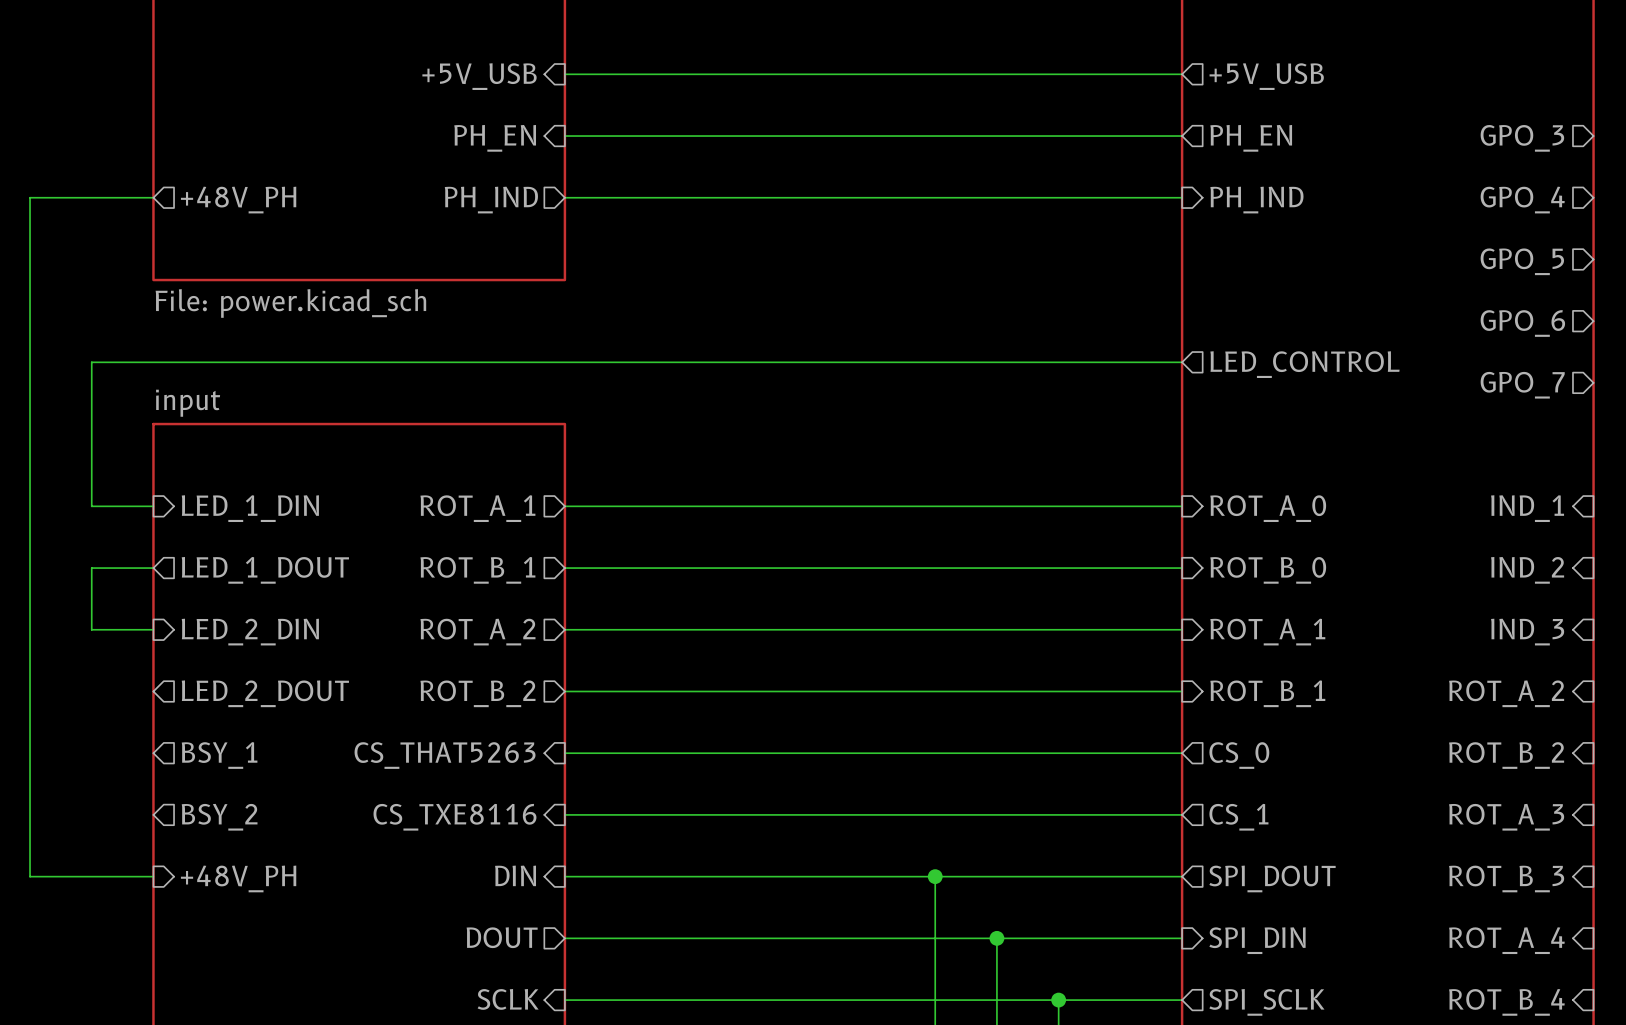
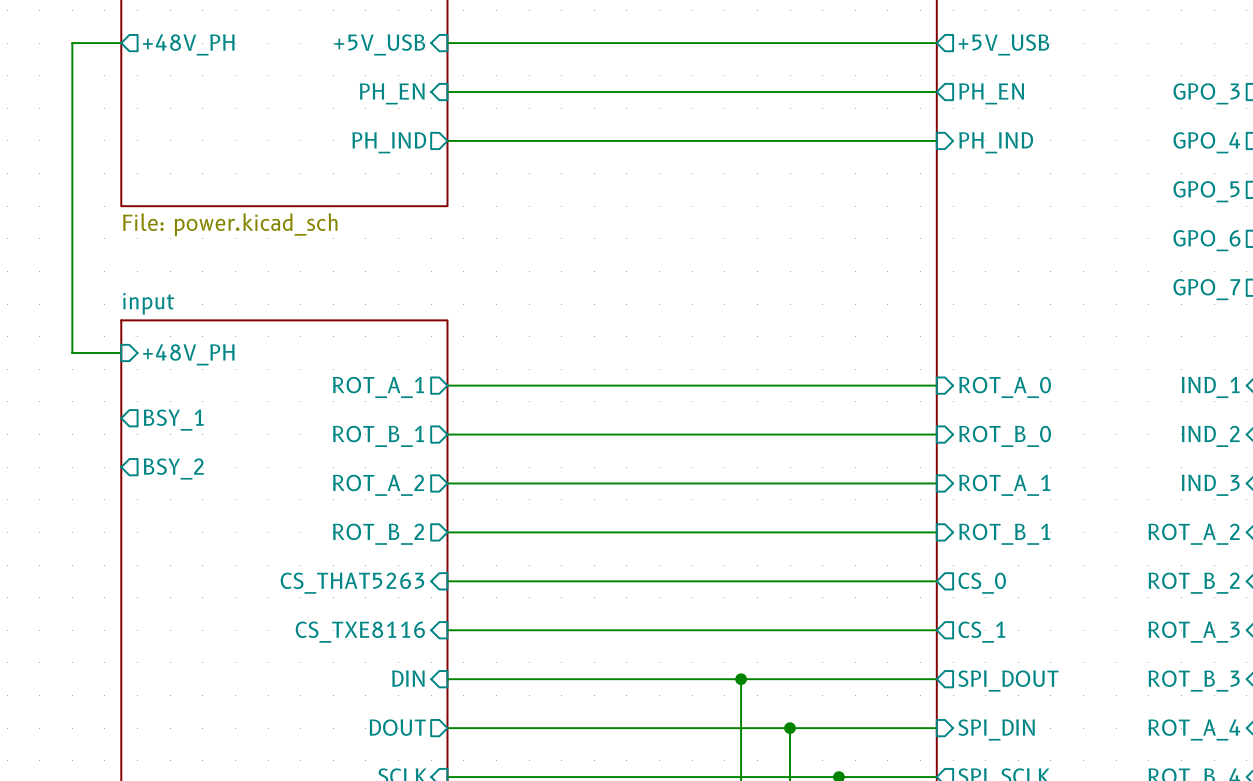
wire: (153, 197) (30, 197) (30, 876) (153, 876) -> none
sheet pin position: +48V_PH (238, 200) -> +48V_PH (188, 44)
wire: (91, 362) (1182, 362) -> (72, 271) (72, 43) (121, 43)
sheet pin: LED_CONTROL (1304, 364) -> none
wire: (91, 465) (91, 506) (153, 506) -> (72, 352) (121, 352)
sheet pin: none -> +48V_PH (188, 354)
sheet pin: LED_1_DIN (250, 508) -> none
wire: (153, 568) (91, 568) (91, 629) (153, 629) -> none
sheet pin: LED_1_DOUT (265, 570) -> none
sheet pin: LED_2_DIN (250, 632) -> none
sheet pin: LED_2_DOUT (265, 693) -> none
sheet pin position: BSY_1 (219, 755) -> BSY_1 (173, 420)
sheet pin position: BSY_2 (219, 817) -> BSY_2 (173, 468)
sheet pin: +48V_PH (238, 878) -> none

